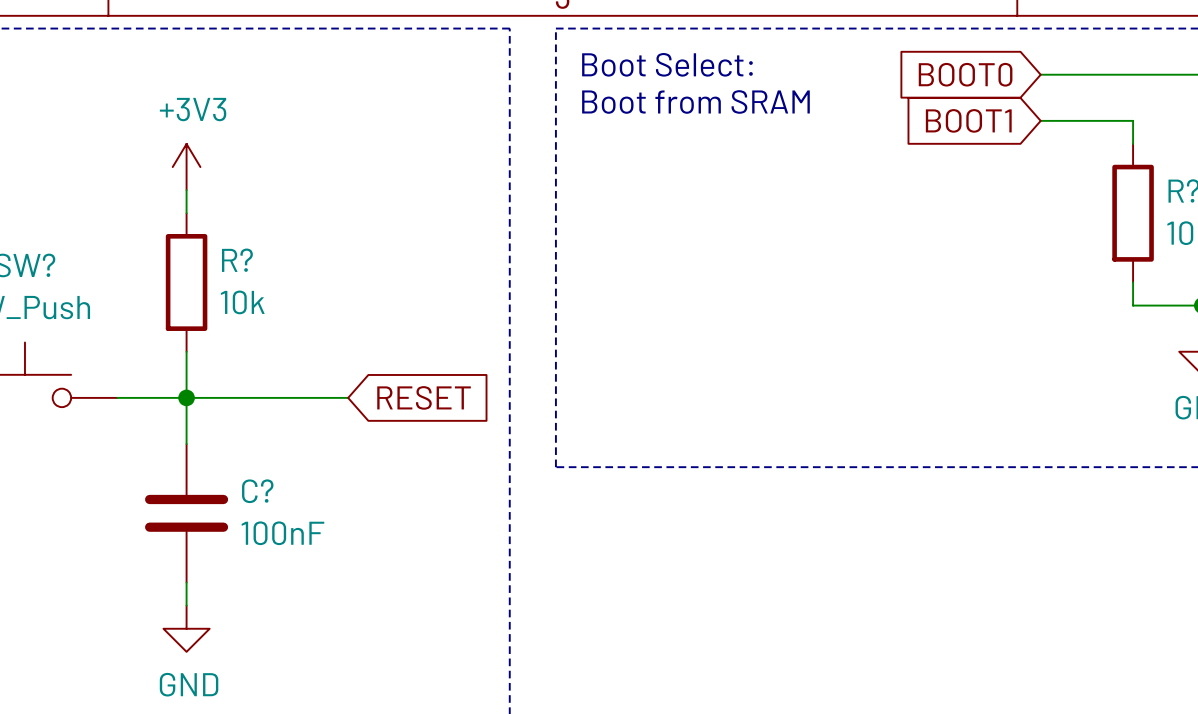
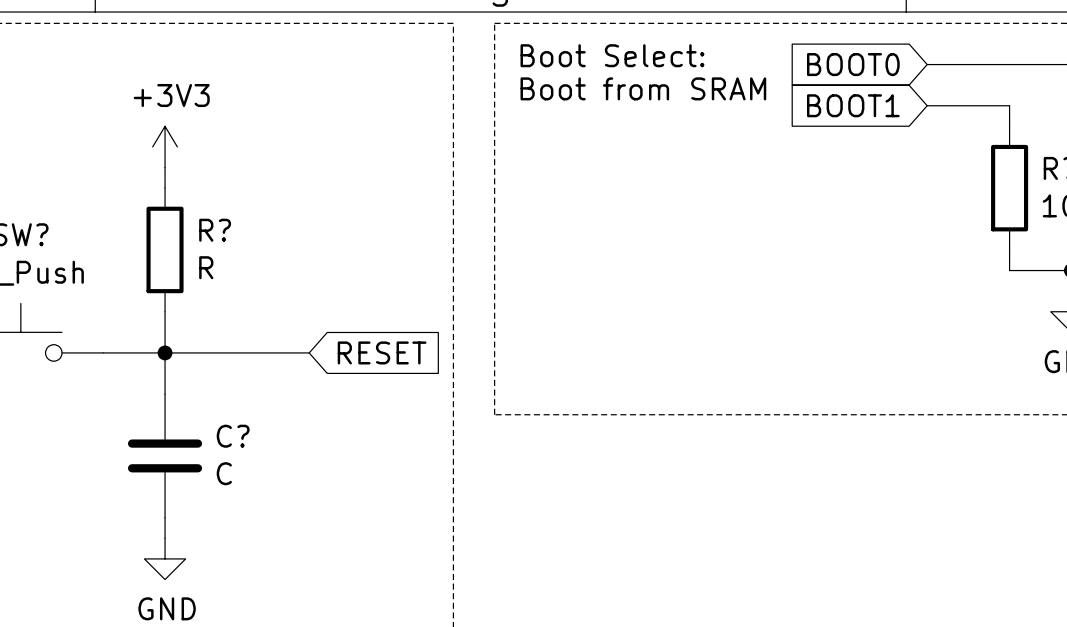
R? value: 10k (242, 302) -> R (206, 267)
C? value: 100nF (282, 533) -> C (224, 473)

